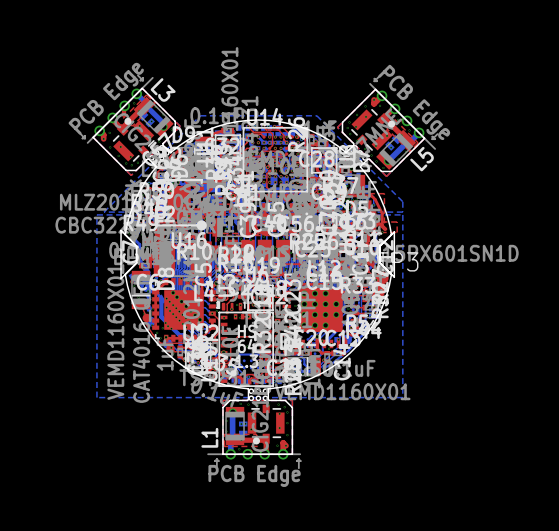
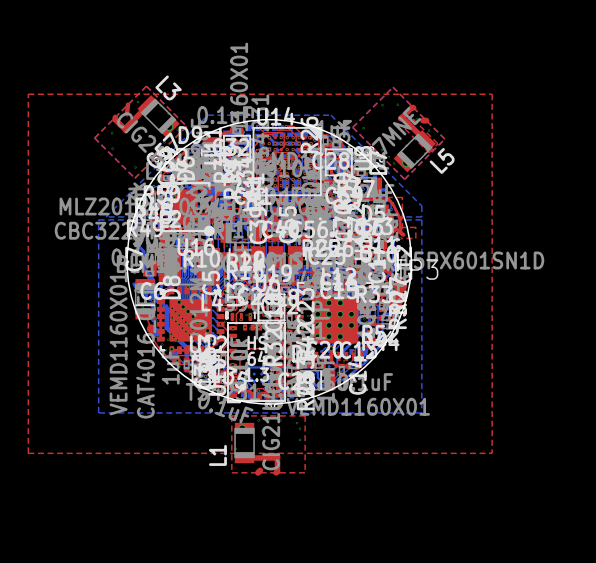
bottom track: (136, 93) (163, 123) (163, 126) -> none
top zone outline: (146, 94) (123, 118) (129, 124) (132, 125) (155, 103) (146, 94) -> none
top zone outline: none -> (28, 94) (28, 453) (492, 453) (492, 94) (28, 94)
top track: (382, 95) (374, 103) (374, 99) -> none
via: (374, 99) -> none
part: (115, 109) -> none
part: (403, 111) -> none
via: (357, 114) -> none
via: (366, 116) -> none
round board edge: none -> [127, 119, 412, 405]
part: (146, 119) -> none
via: (151, 121) -> none
via: (349, 122) -> none
via: (148, 124) -> none
via: (139, 125) -> none
via: (356, 126) -> none
part: (373, 129) -> none
top track: (99, 130) (103, 134) (103, 138) -> none
bottom track: (419, 132) (388, 160) -> none
via: (350, 134) -> none
via: (387, 135) -> none
via: (103, 138) -> none
part: (133, 139) -> none
via: (357, 140) -> none
part: (393, 142) -> none
via: (376, 145) -> none
via: (120, 146) -> none
via: (391, 147) -> none
via: (118, 155) -> none
via: (130, 156) -> none
via: (137, 162) -> none
via: (126, 163) -> none
via: (383, 167) -> none
board edge: (136, 246) (121, 230) (121, 278) (136, 263) -> none
board edge: (136, 246) (125, 234) (127, 225) (140, 190) (156, 166) (148, 159) (136, 170) (126, 170) (93, 137) (142, 88) (175, 121) (175, 131) (162, 144) (170, 152) (187, 140) (206, 130) (237, 121) (258, 120) (279, 121) (310, 130) (329, 140) (346, 152) (353, 144) (342, 132) (342, 122) (375, 89) (424, 138) (391, 171) (381, 171) (368, 159) (360, 166) (376, 190) (389, 225) (391, 234) (380, 246) (394, 231) (394, 277) (380, 263) (391, 274) (389, 285) (386, 296) (371, 327) (349, 353) (332, 367) (312, 377) (290, 385) (268, 388) (268, 400) (285, 400) (292, 407) (292, 454) (222, 454) (222, 407) (230, 400) (247, 400) (248, 388) (215, 382) (194, 372) (175, 360) (158, 345) (139, 317) (127, 285) (125, 274) (136, 263) -> none
part: none -> (190, 320)
part: none -> (256, 362)
hole: (251, 391) -> none
hole: (251, 398) -> none
hole: (258, 398) -> none
hole: (265, 398) -> none
via: (240, 403) -> none
via: (278, 404) -> none
bottom track: (232, 412) (230, 454) -> none
via: (279, 413) -> none
via: (245, 423) -> none
via: (241, 424) -> none
part: (266, 424) -> none
part: (243, 428) -> none
via: (279, 428) -> none
via: (251, 429) -> none
top zone outline: (224, 434) (224, 446) (257, 446) (256, 434) (224, 434) -> none
via: (287, 435) -> none
via: (277, 445) -> none
top track: (286, 445) (283, 442) (283, 454) -> none
via: (286, 445) -> none
via: (239, 449) -> none
part: (254, 459) -> none

